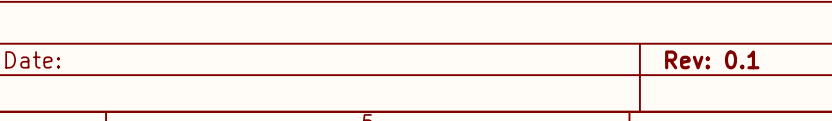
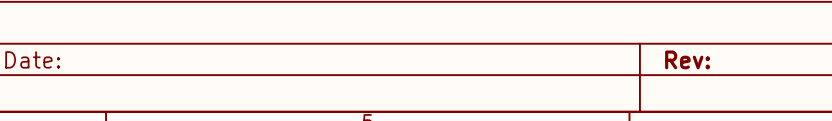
title block: Rev: 0.1 (712, 59) -> Rev: (687, 59)

